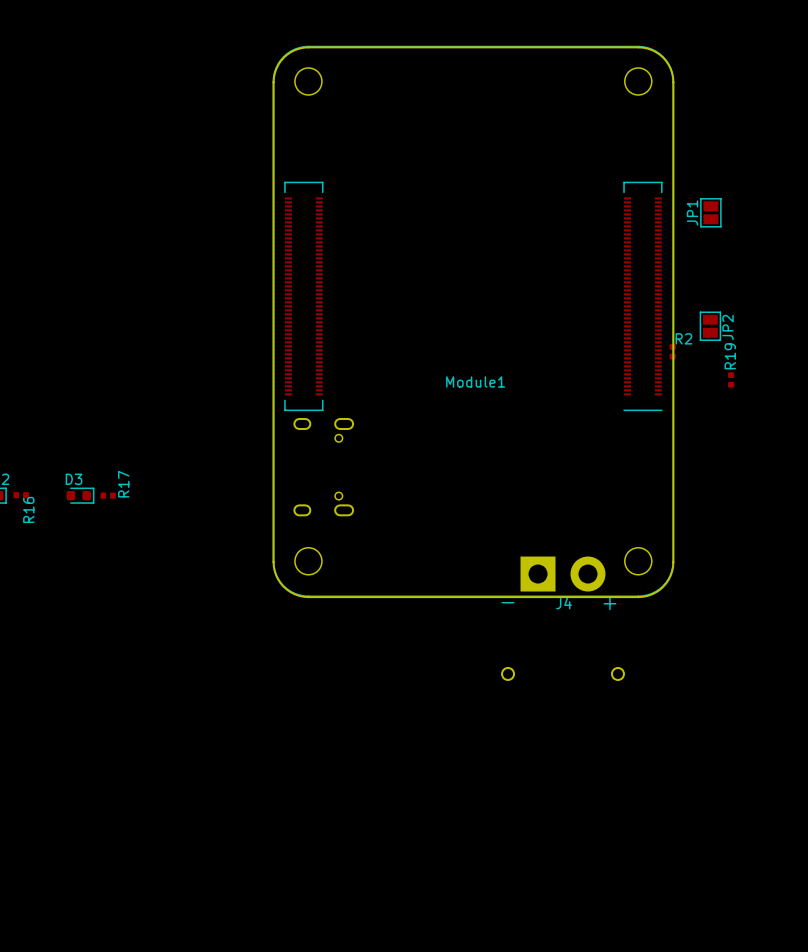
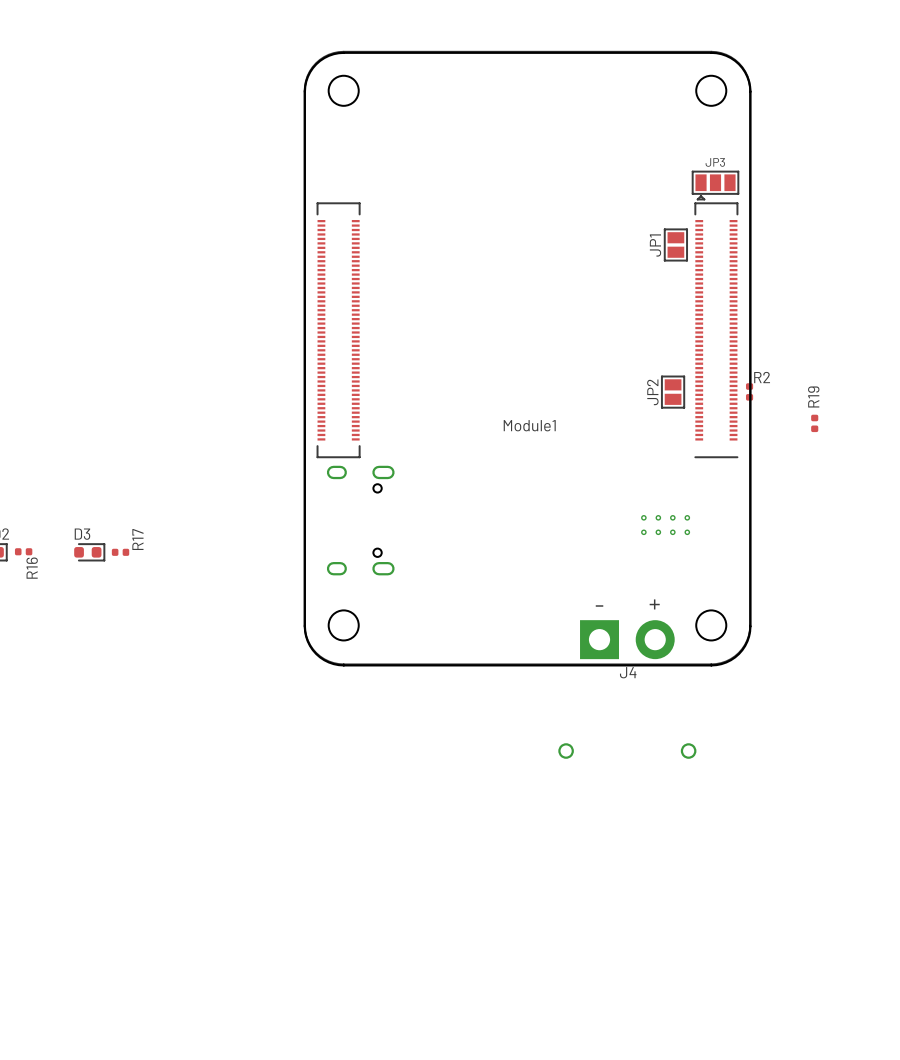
JP3: none -> (715, 185)
JP1 position: (710, 212) -> (675, 244)
JP2 position: (710, 326) -> (673, 392)
JP2 name position: JP2 (728, 327) -> JP2 (652, 392)
part: none -> (665, 525)
J4 text position: - (508, 602) -> - (599, 606)
J4 text position: + (609, 603) -> + (654, 604)

